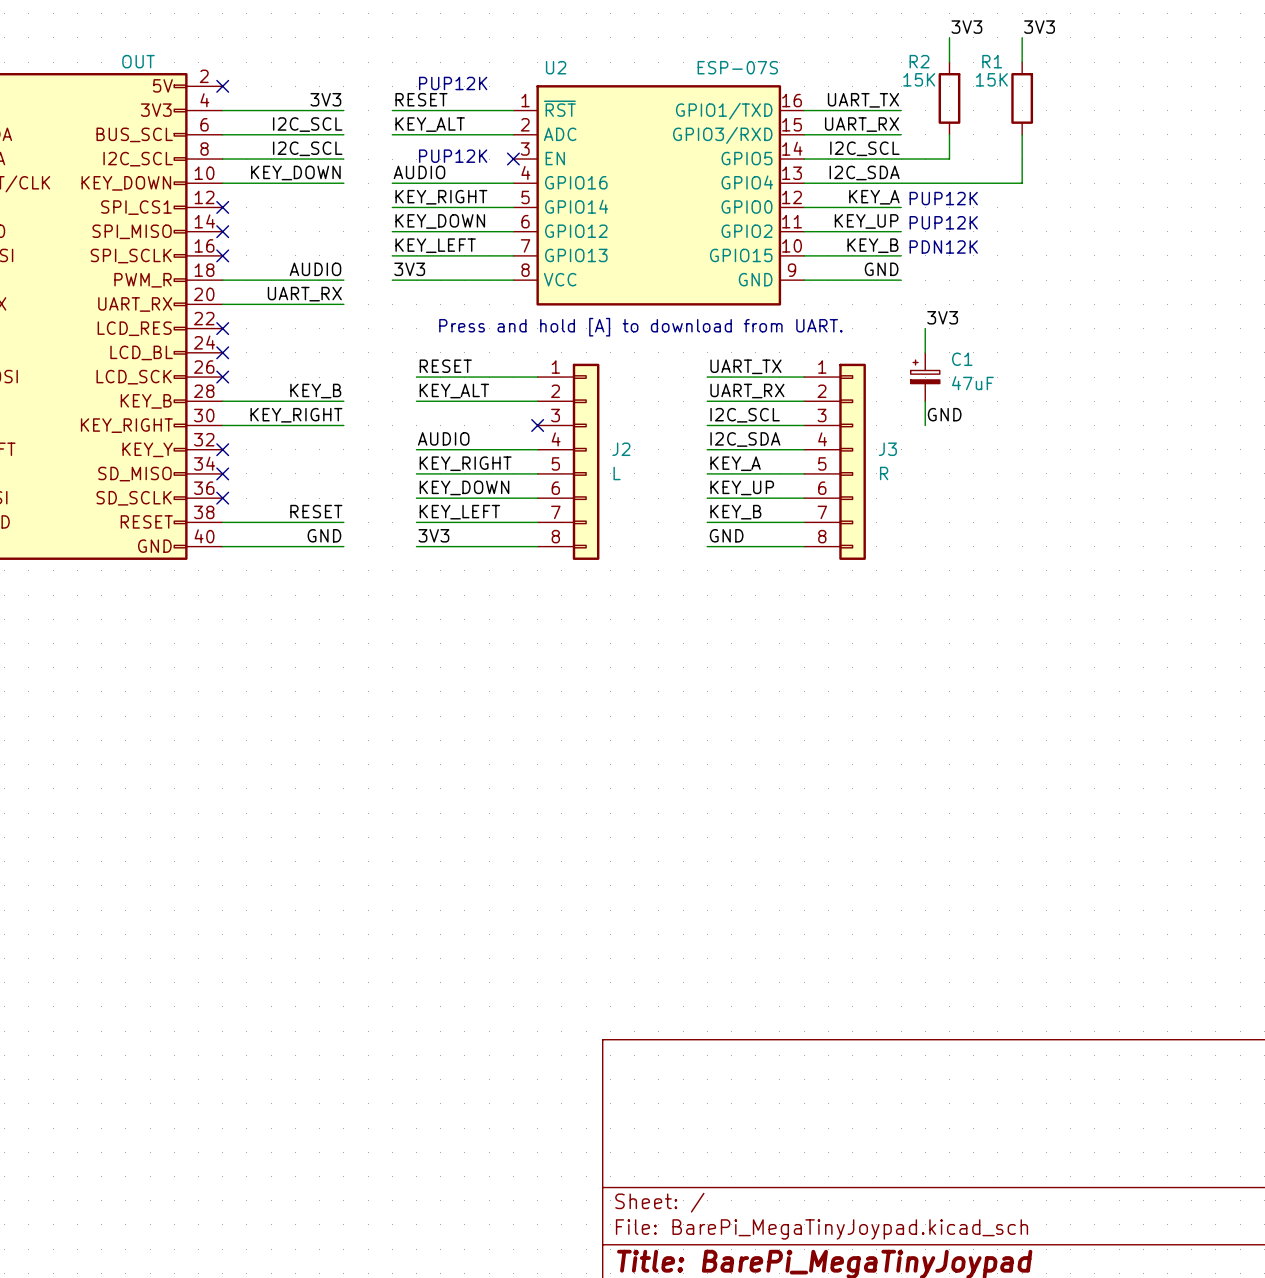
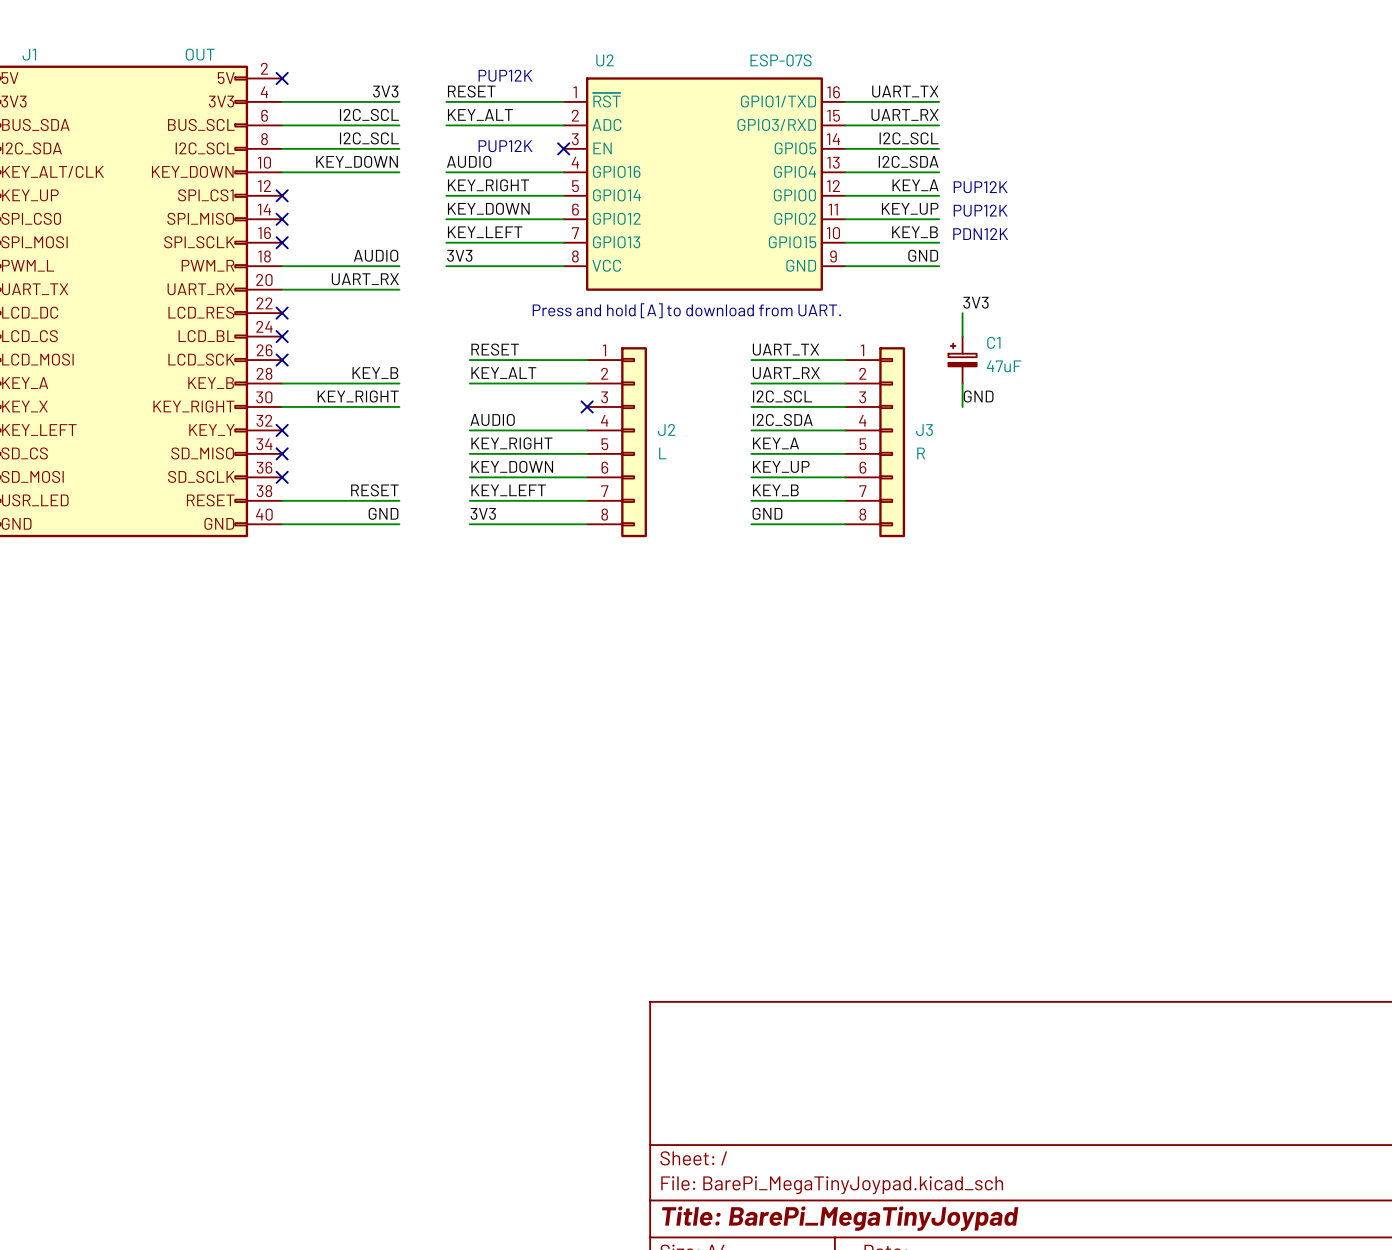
label: 3V3 (966, 27) -> none
label: 3V3 (1039, 27) -> none
wire: (949, 37) (949, 62) -> none
wire: (1022, 37) (1022, 62) -> none
R2: 15K (949, 98) -> none
R1: 15K (1022, 98) -> none
wire: (949, 134) (949, 159) (901, 159) -> none
wire: (1022, 134) (1022, 183) (901, 183) -> none

